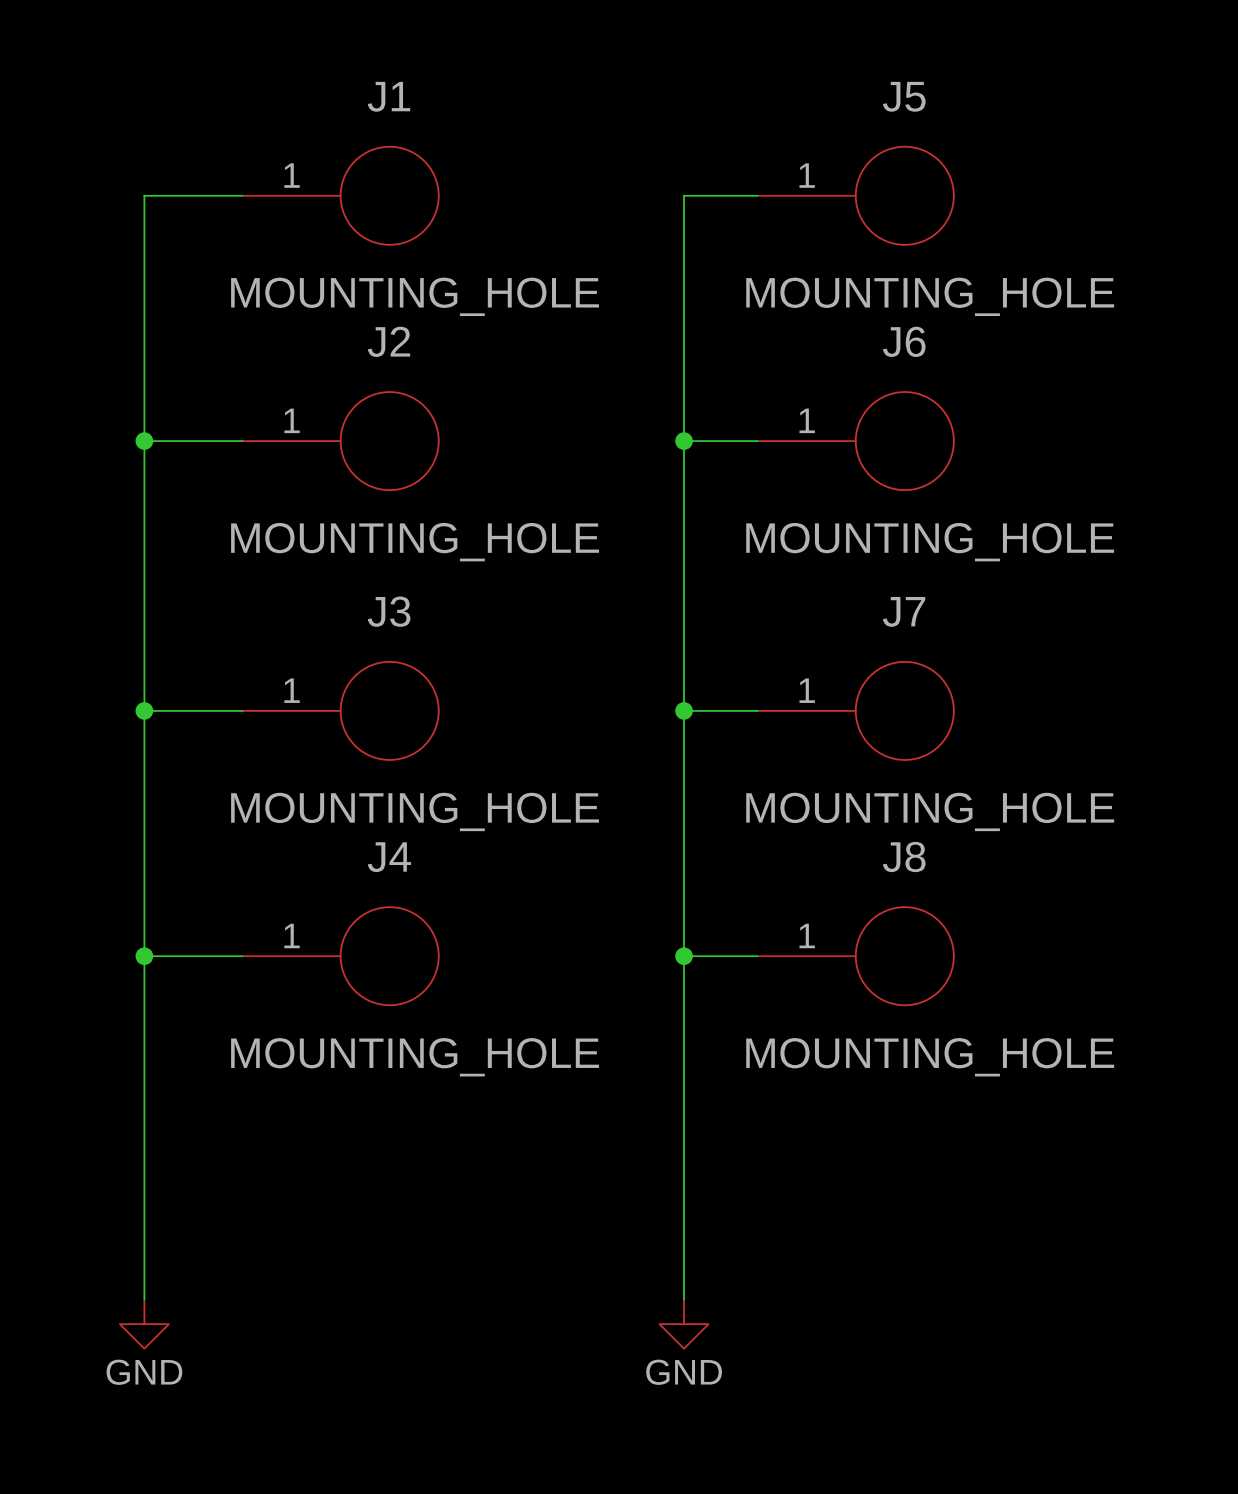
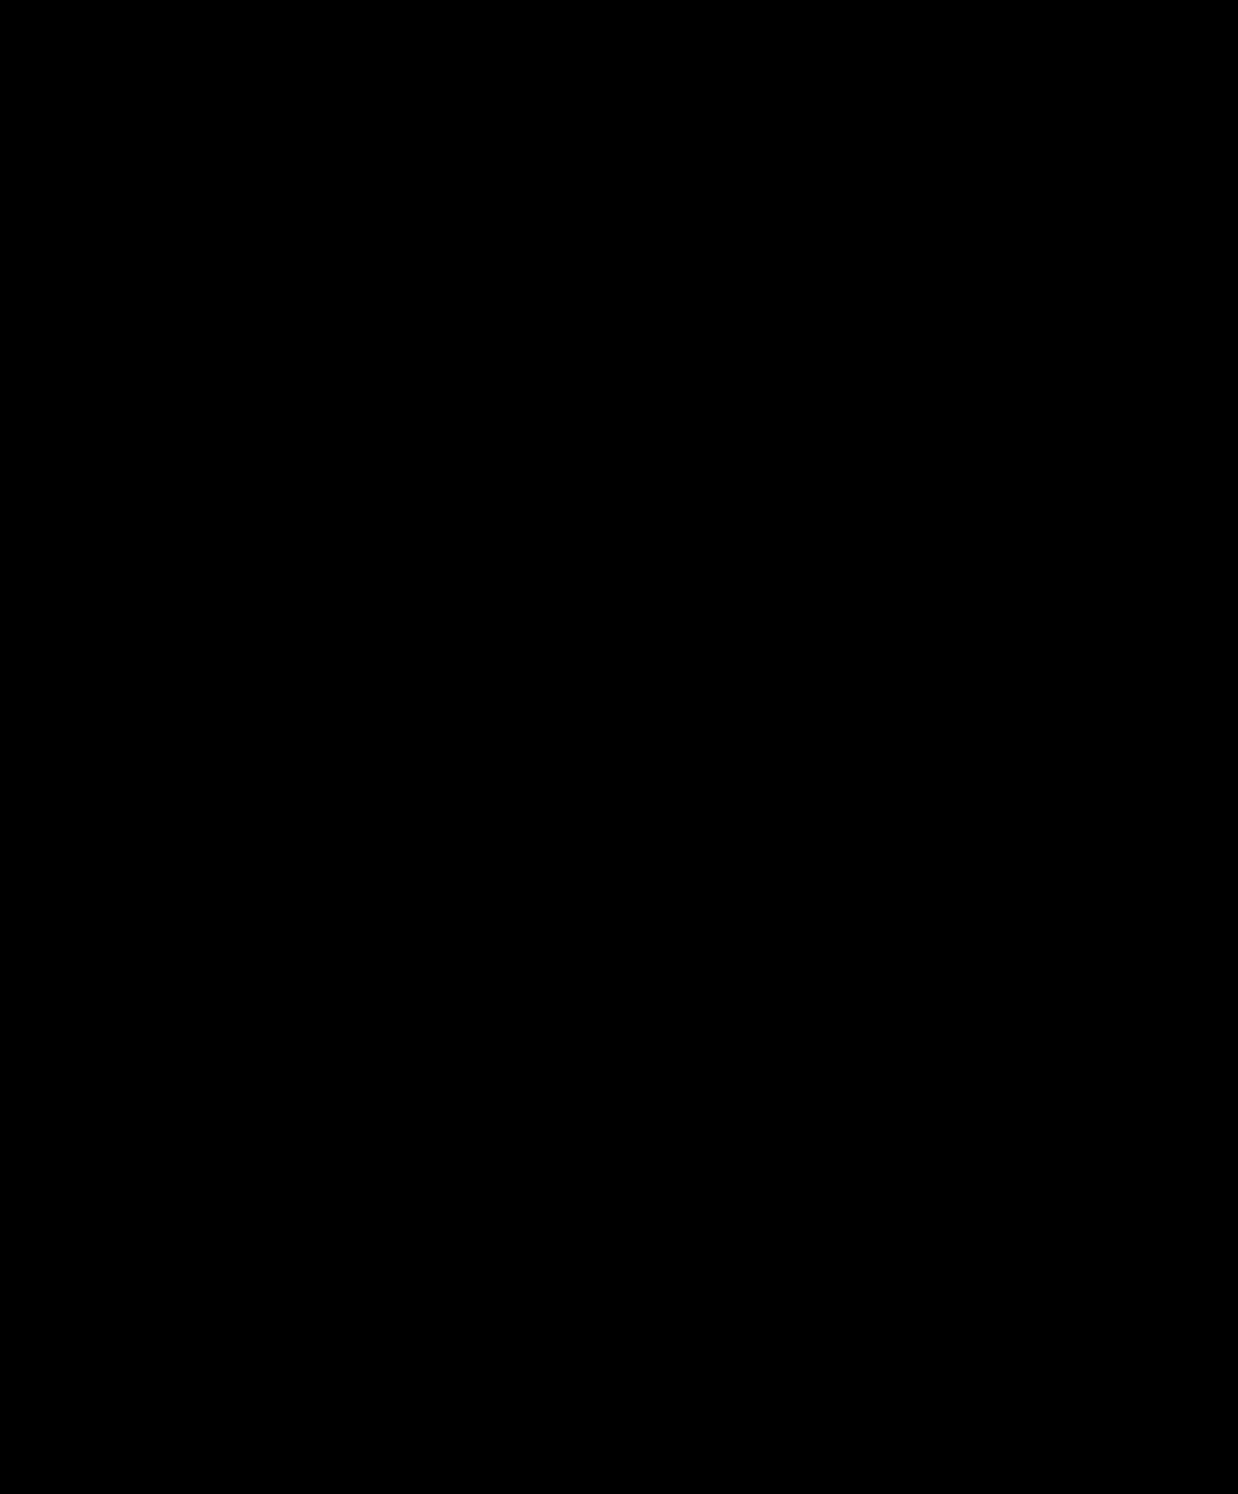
wire: (242, 195) (144, 195) (144, 1299) -> none
J1: MOUNTING_HOLE (340, 195) -> none
wire: (757, 195) (684, 195) (684, 1299) -> none
J5: MOUNTING_HOLE (855, 195) -> none
wire: (144, 441) (242, 441) -> none
junction: (144, 441) -> none
J2: MOUNTING_HOLE (340, 441) -> none
wire: (684, 441) (757, 441) -> none
junction: (684, 441) -> none
J6: MOUNTING_HOLE (855, 441) -> none
wire: (144, 710) (242, 710) -> none
junction: (144, 710) -> none
J3: MOUNTING_HOLE (340, 710) -> none
wire: (684, 710) (757, 710) -> none
junction: (684, 710) -> none
J7: MOUNTING_HOLE (855, 710) -> none
wire: (144, 956) (242, 956) -> none
junction: (144, 956) -> none
J4: MOUNTING_HOLE (340, 956) -> none
wire: (684, 956) (757, 956) -> none
junction: (684, 956) -> none
J8: MOUNTING_HOLE (855, 956) -> none
power symbol: GND (144, 1324) -> none
power symbol: GND (684, 1324) -> none

